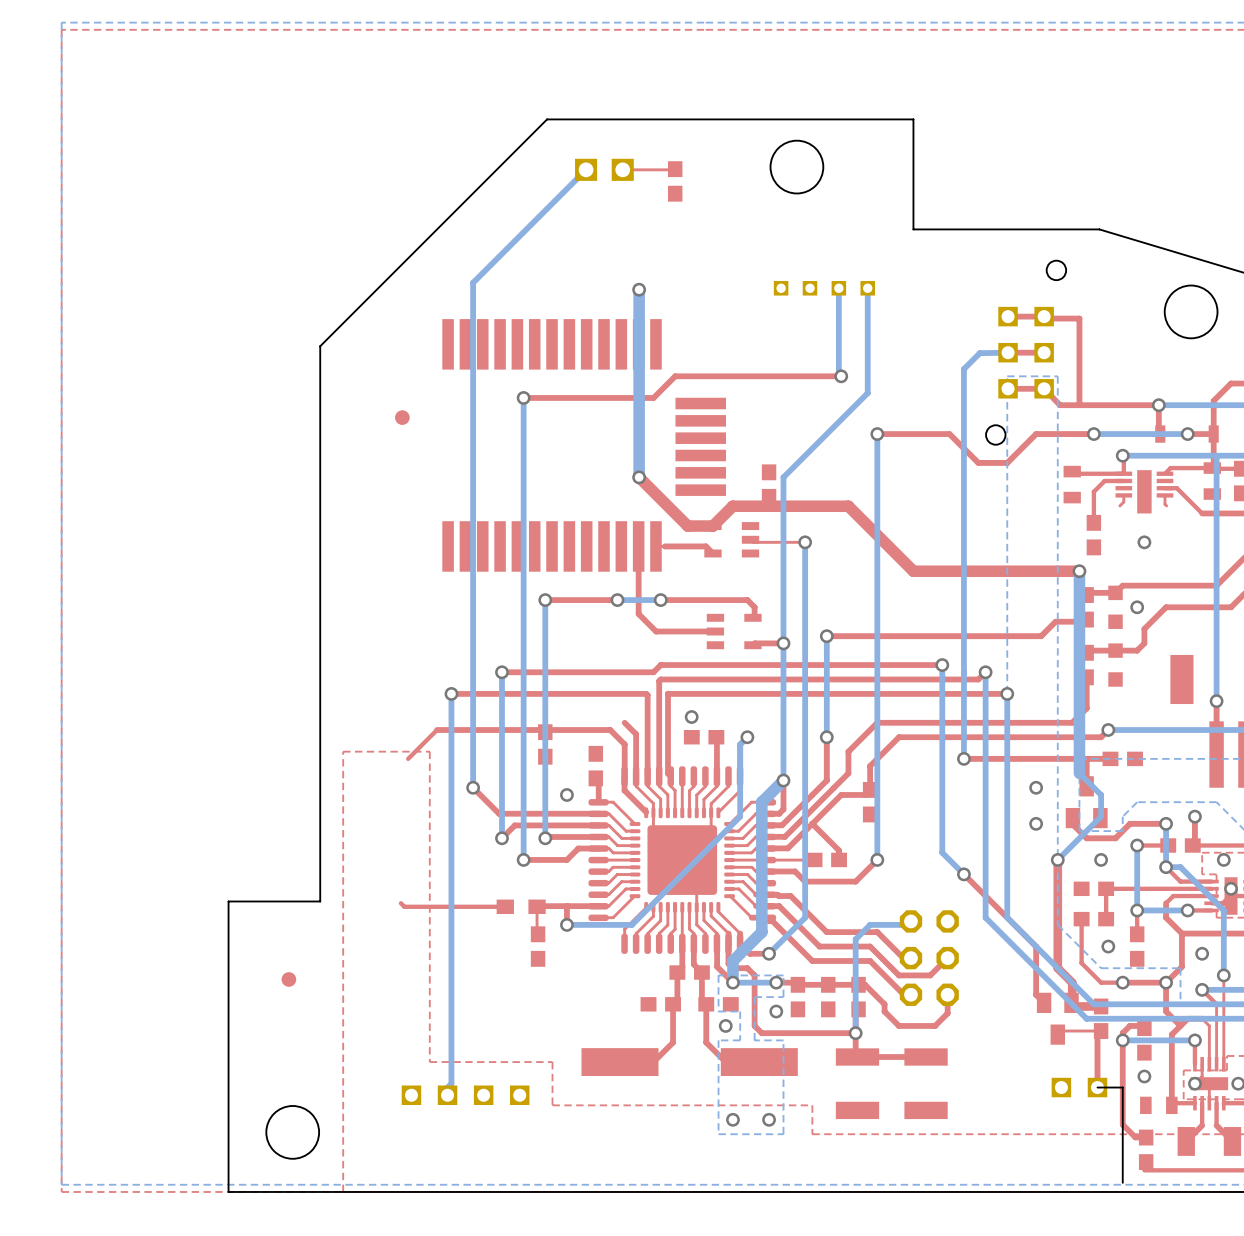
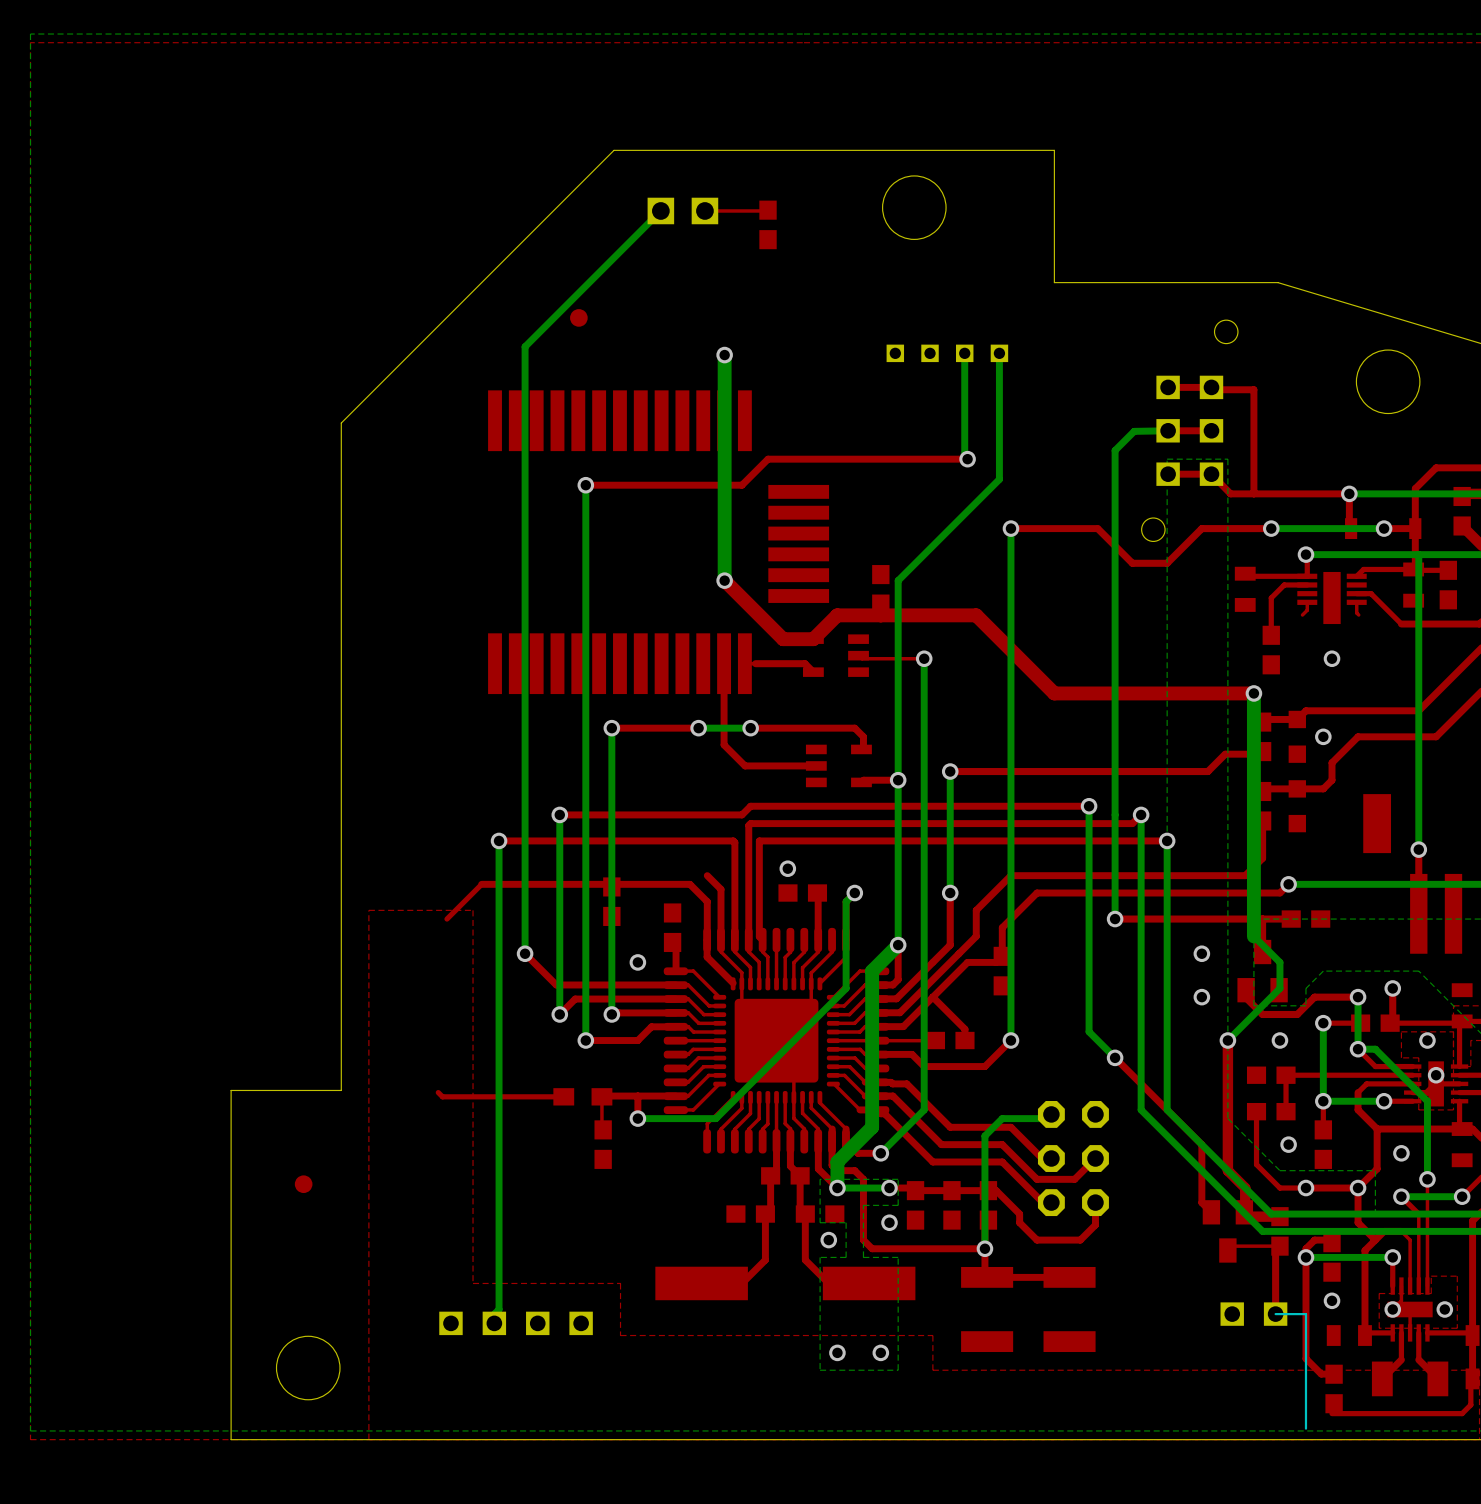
part position: (402, 417) -> (578, 317)

